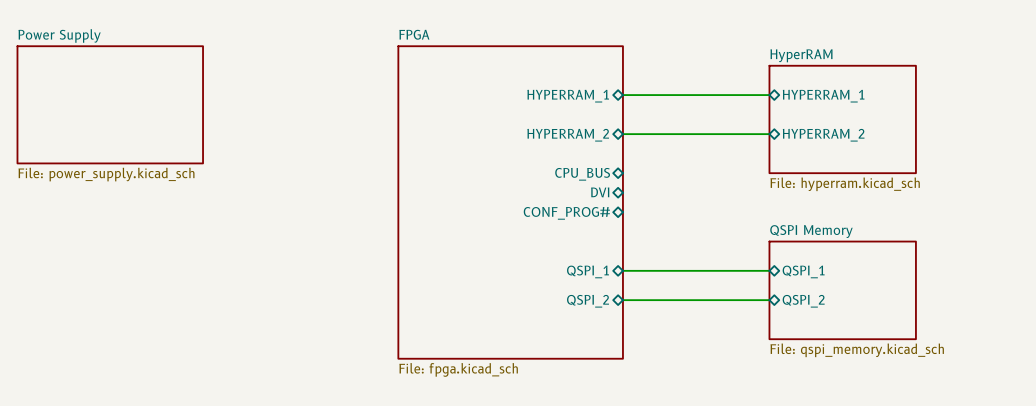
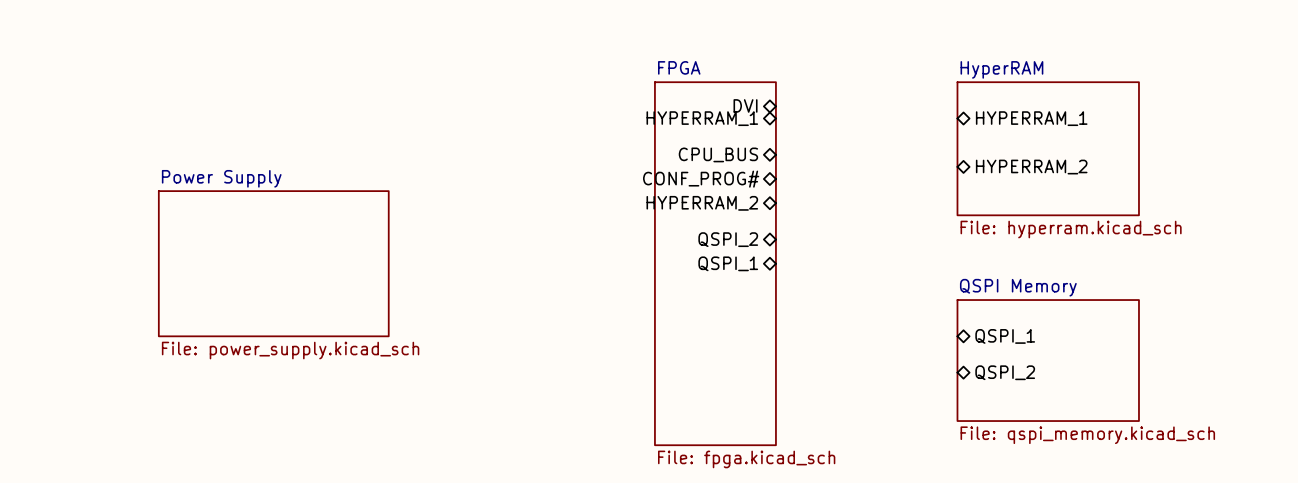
sheet pin: none -> DVI (745, 105)
wire: (622, 95) (769, 95) -> none
sheet Power Supply position: (110, 104) -> (273, 263)
wire: (622, 134) (769, 134) -> none
sheet pin position: HYPERRAM_2 (568, 135) -> HYPERRAM_2 (702, 203)
sheet pin: none -> CONF_PROG# (701, 179)
sheet pin position: CPU_BUS (582, 174) -> CPU_BUS (718, 154)
sheet pin: DVI (600, 192) -> QSPI_2 (728, 239)
sheet FPGA: File: fpga.kicad_sch (510, 202) -> none
sheet FPGA: none -> File: fpga.kicad_sch (715, 263)
sheet pin: CONF_PROG# (566, 213) -> QSPI_1 (728, 263)
wire: (622, 270) (769, 270) -> none
sheet pin: QSPI_1 (588, 271) -> none
wire: (622, 300) (769, 300) -> none
sheet pin: QSPI_2 (588, 301) -> none

